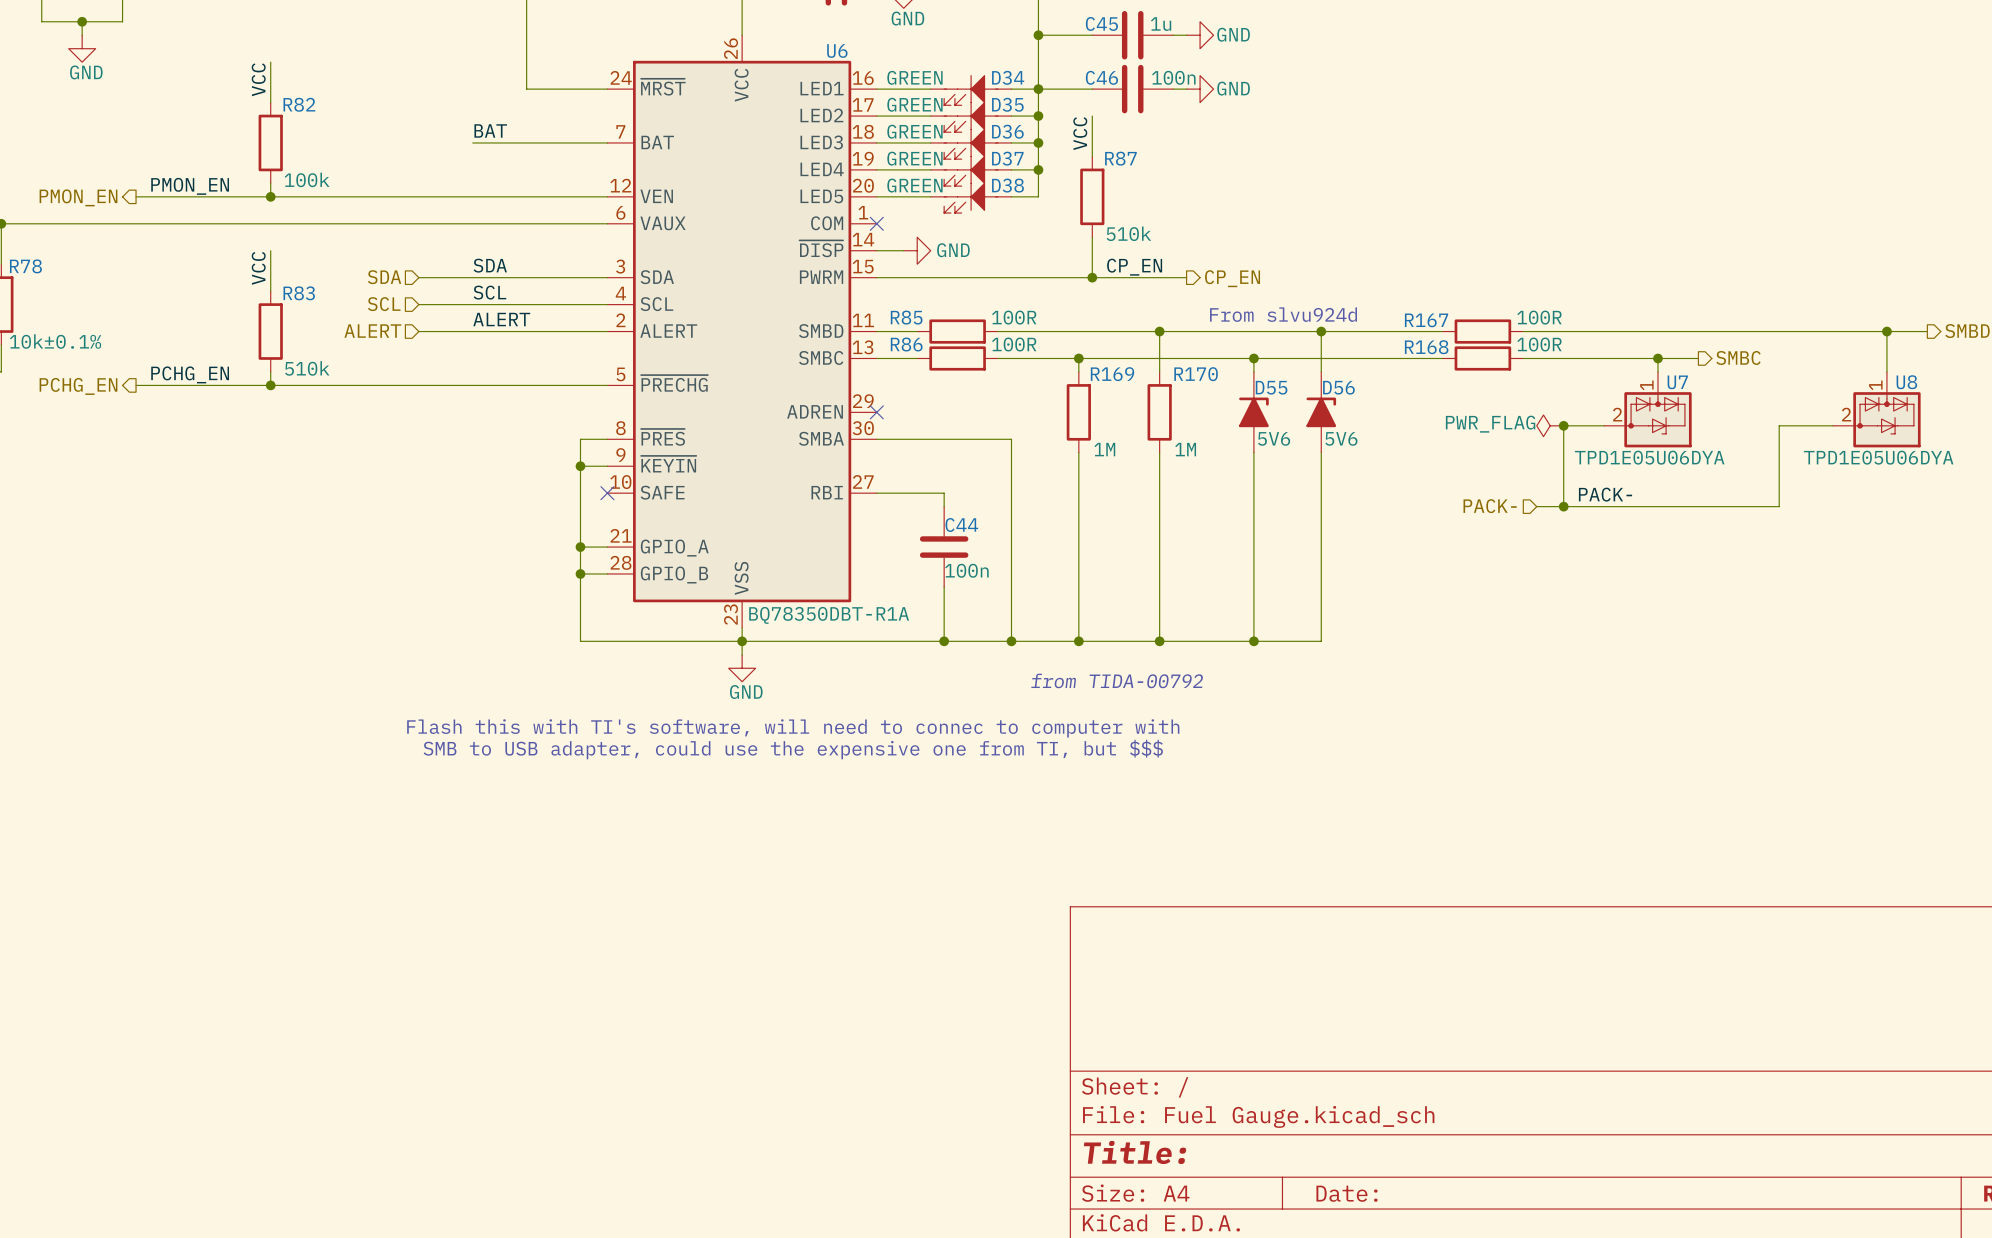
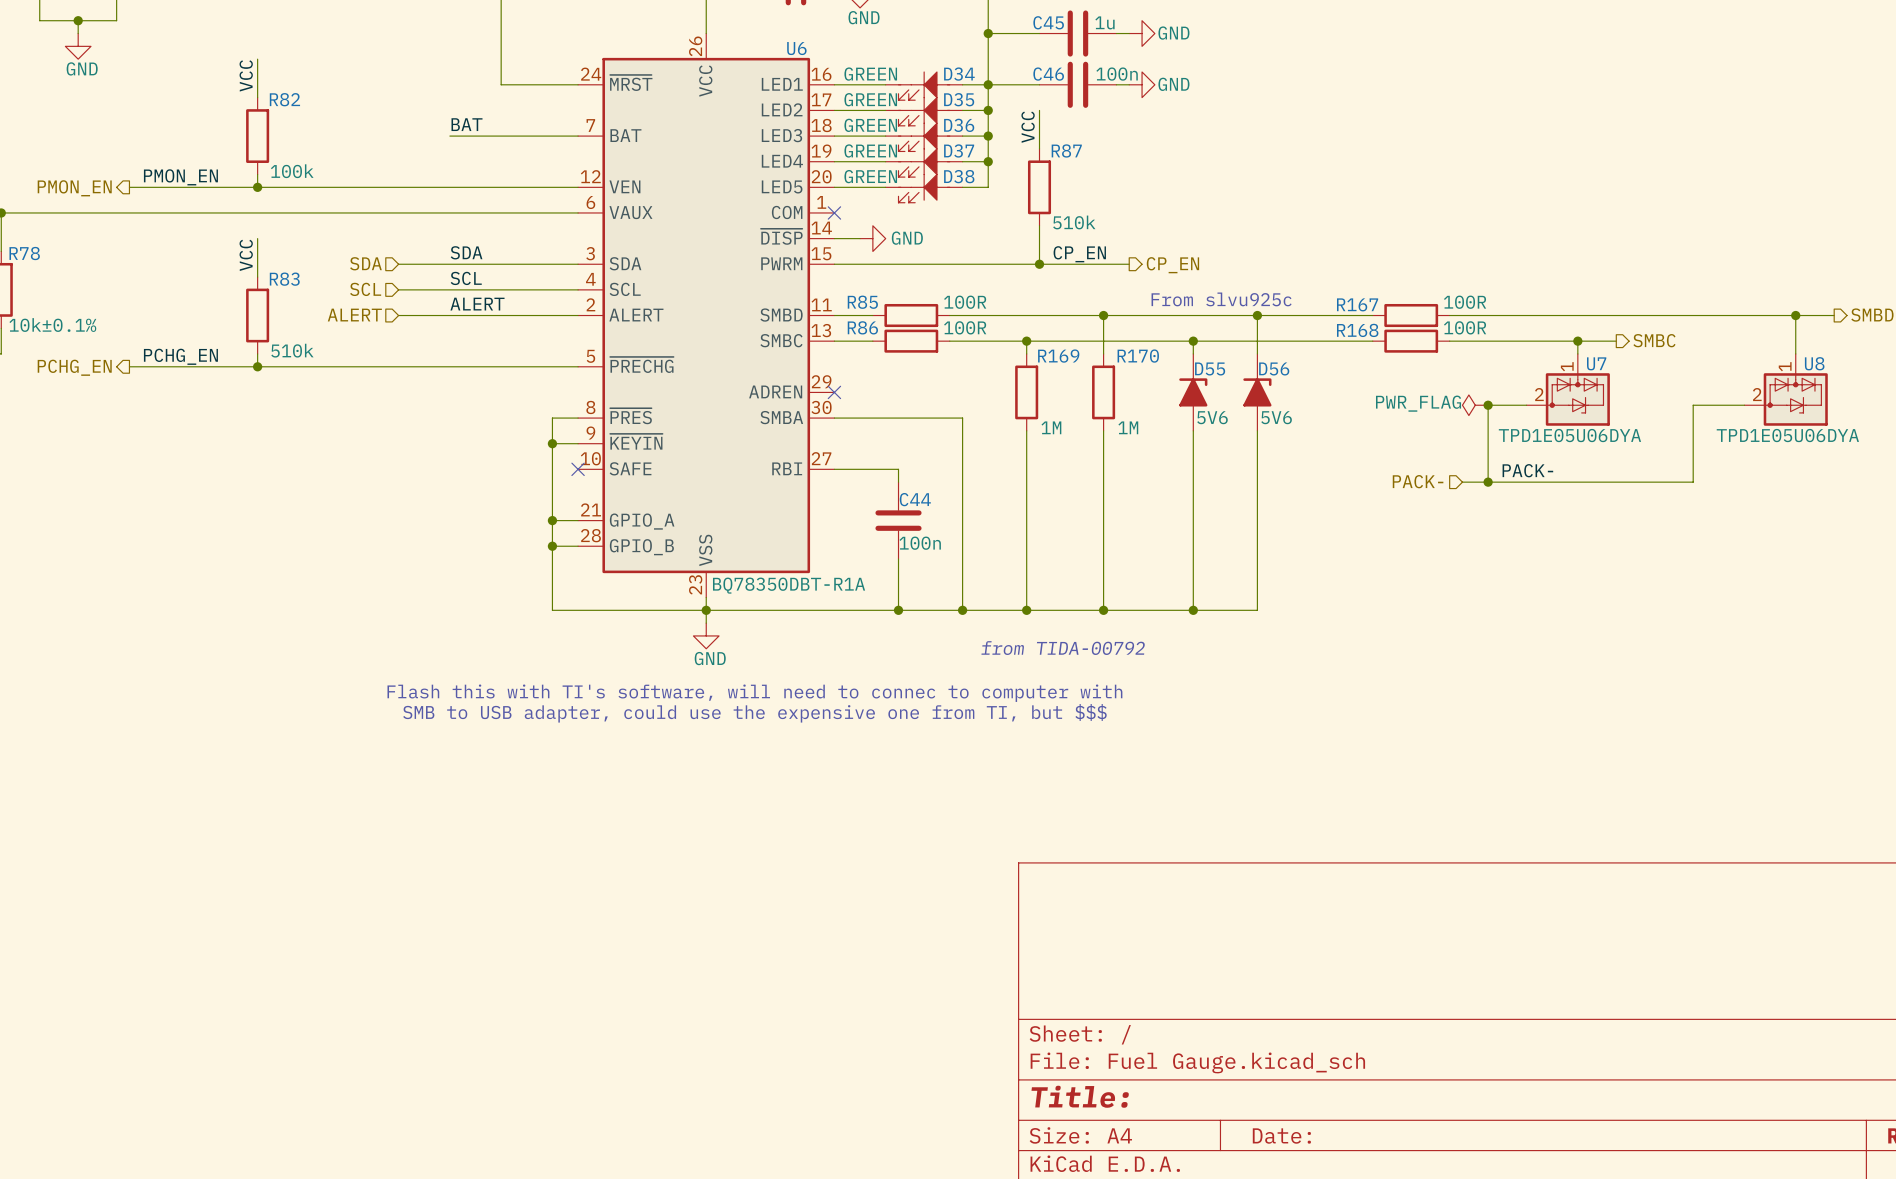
text: From slvu924d (1283, 314) -> From slvu925c (1221, 299)

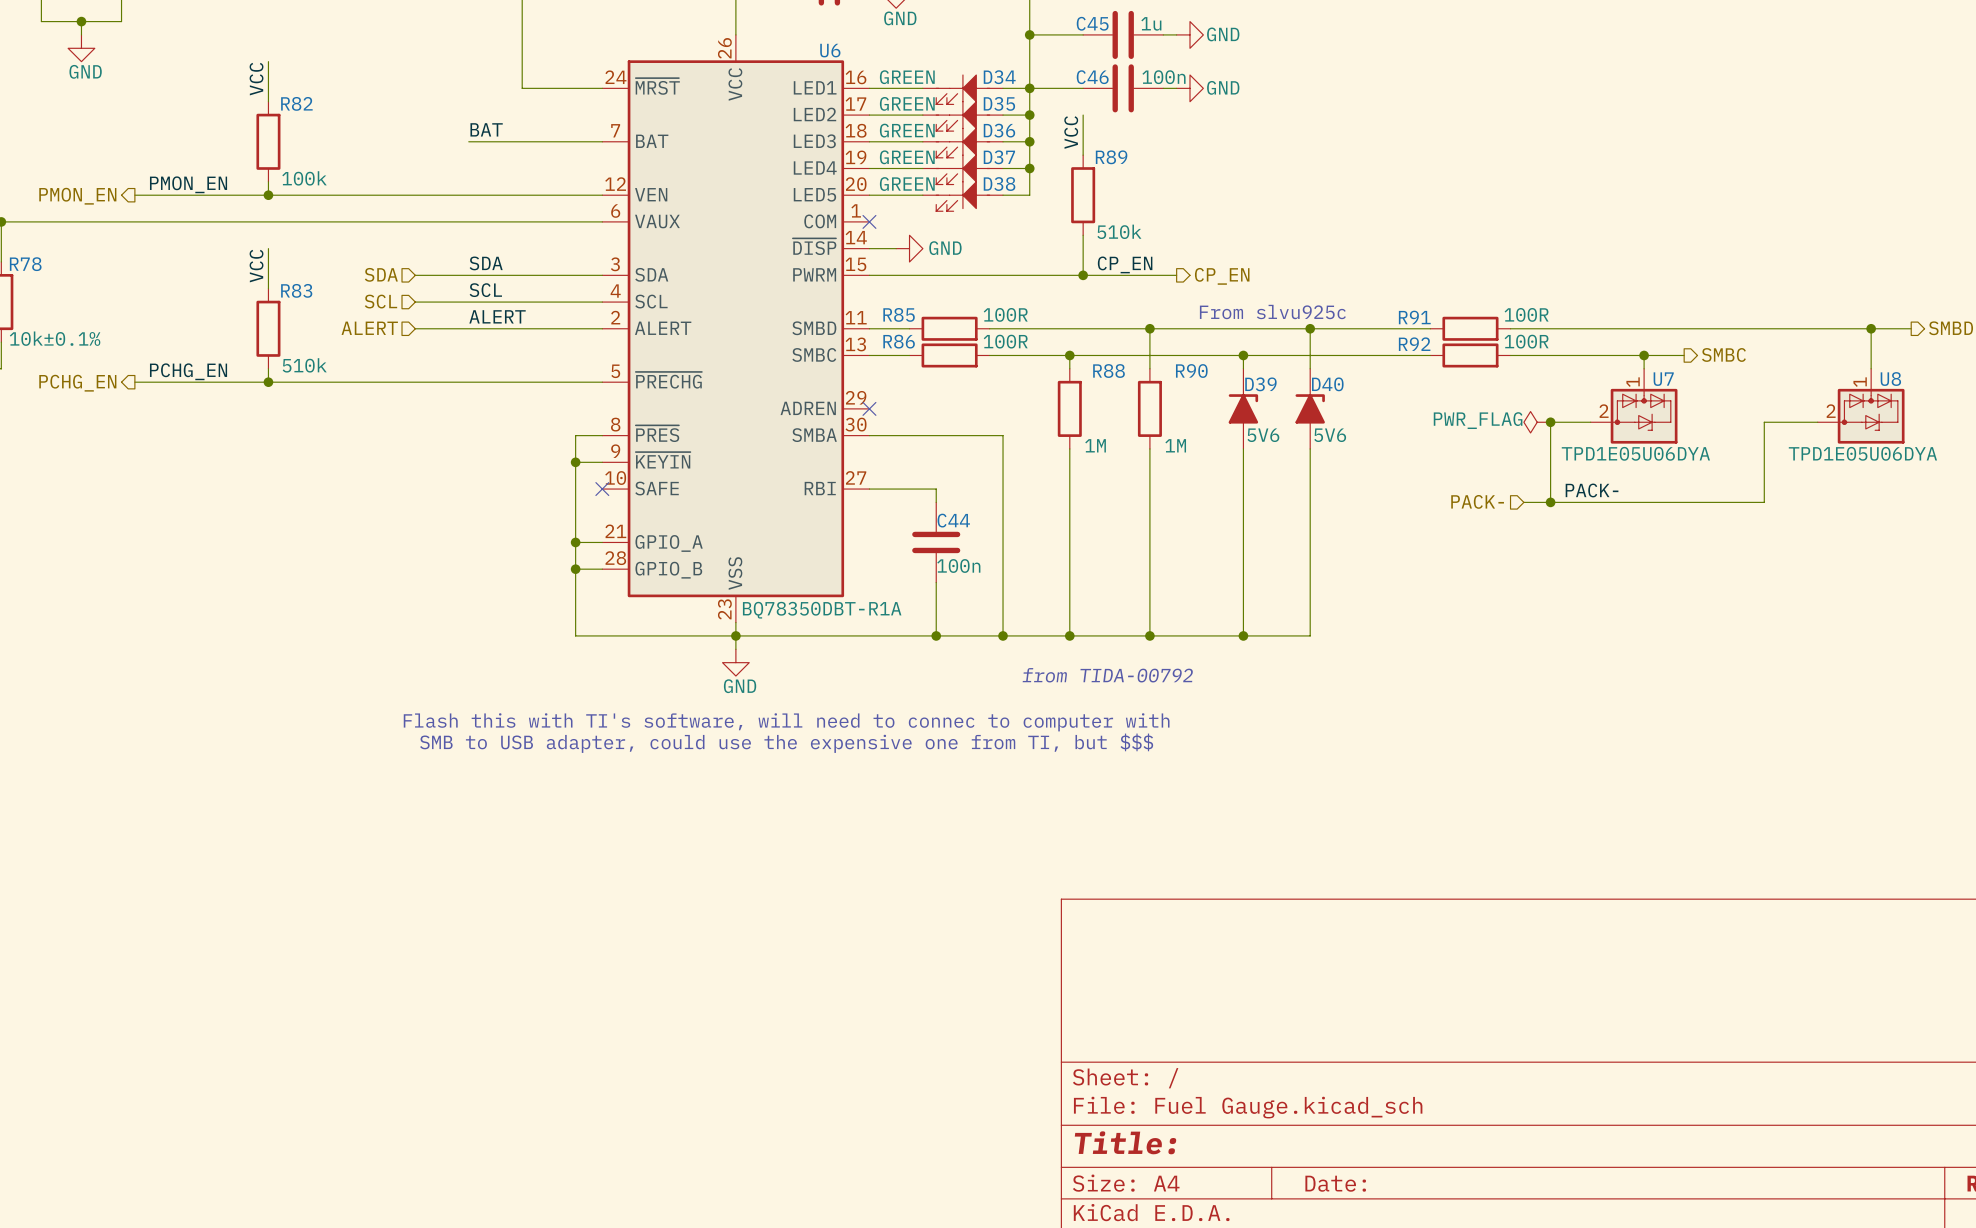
R87 name: R87 (1066, 150) -> R89 (1111, 157)
R167 name: R167 (1357, 304) -> R91 (1414, 317)
R168 name: R168 (1357, 330) -> R92 (1414, 344)
R169 name: R169 (1058, 356) -> R88 (1109, 371)
R170 name: R170 (1138, 356) -> R90 (1191, 371)
D55 name: D55 (1210, 368) -> D39 (1260, 384)
D56 name: D56 (1274, 368) -> D40 (1327, 384)

